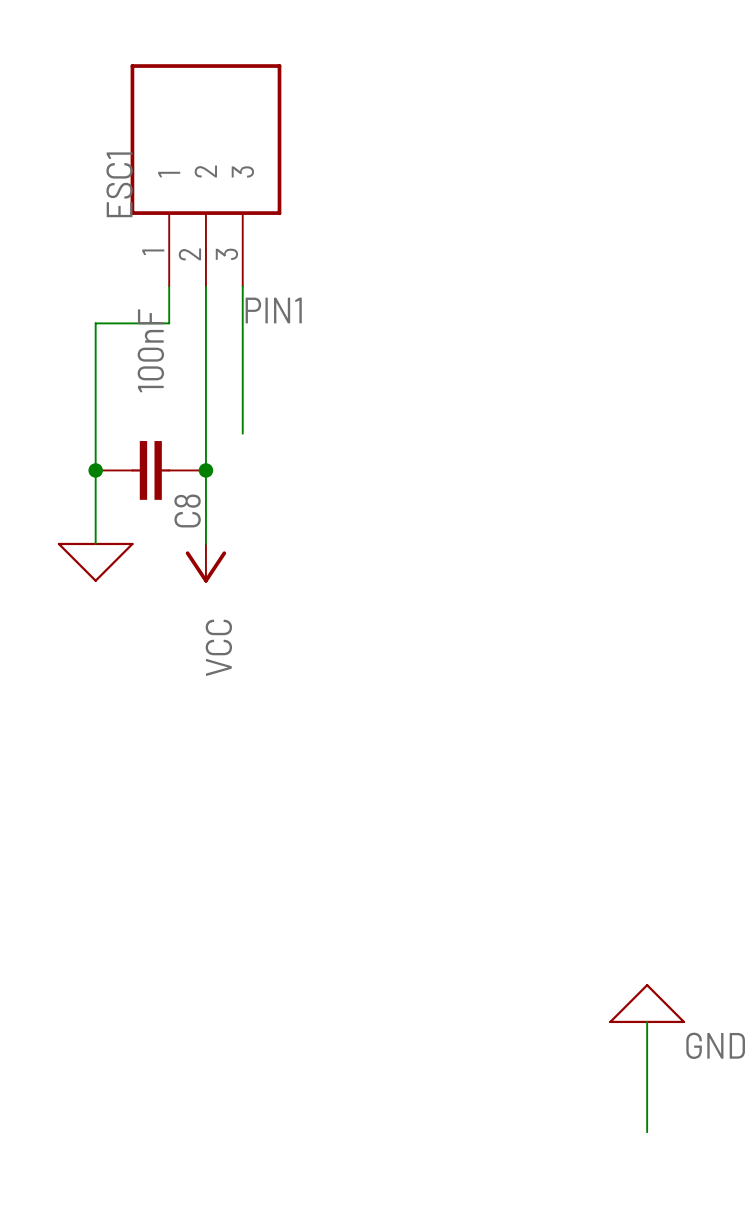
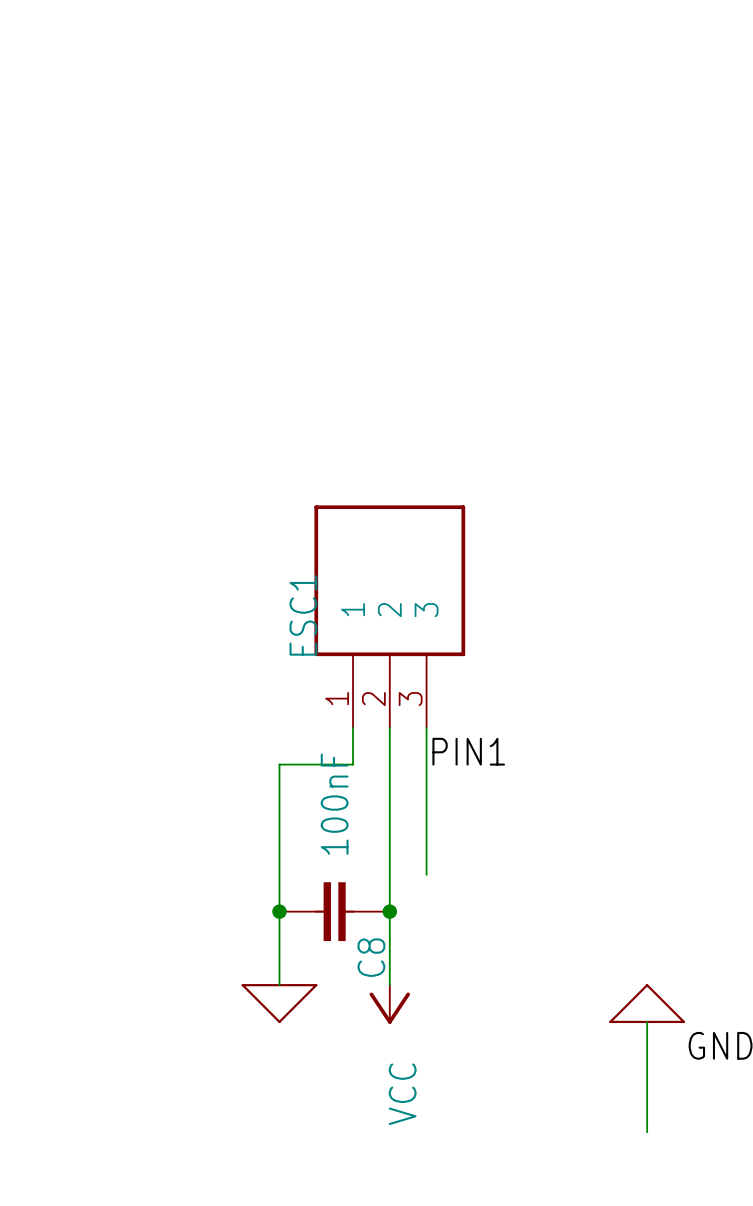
ESC1 position: (205, 175) -> (389, 616)
wire: (169, 286) (169, 323) (95, 323) (95, 543) -> none
wire: (205, 286) (205, 543) -> none
wire: (242, 286) (242, 433) -> none
label: PIN1 (273, 310) -> none
junction: (95, 470) -> none
C8 position: (150, 470) -> (334, 911)
junction: (205, 470) -> none
power symbol: (95, 562) -> none
power symbol: VCC (205, 563) -> none
wire: none -> (353, 727) (353, 764) (279, 764) (279, 985)
wire: none -> (389, 727) (389, 985)
wire: none -> (426, 727) (426, 874)
label: none -> PIN1 (468, 751)
junction: none -> (279, 911)
junction: none -> (389, 911)
power symbol: none -> (279, 1003)
power symbol: none -> VCC (389, 1004)

